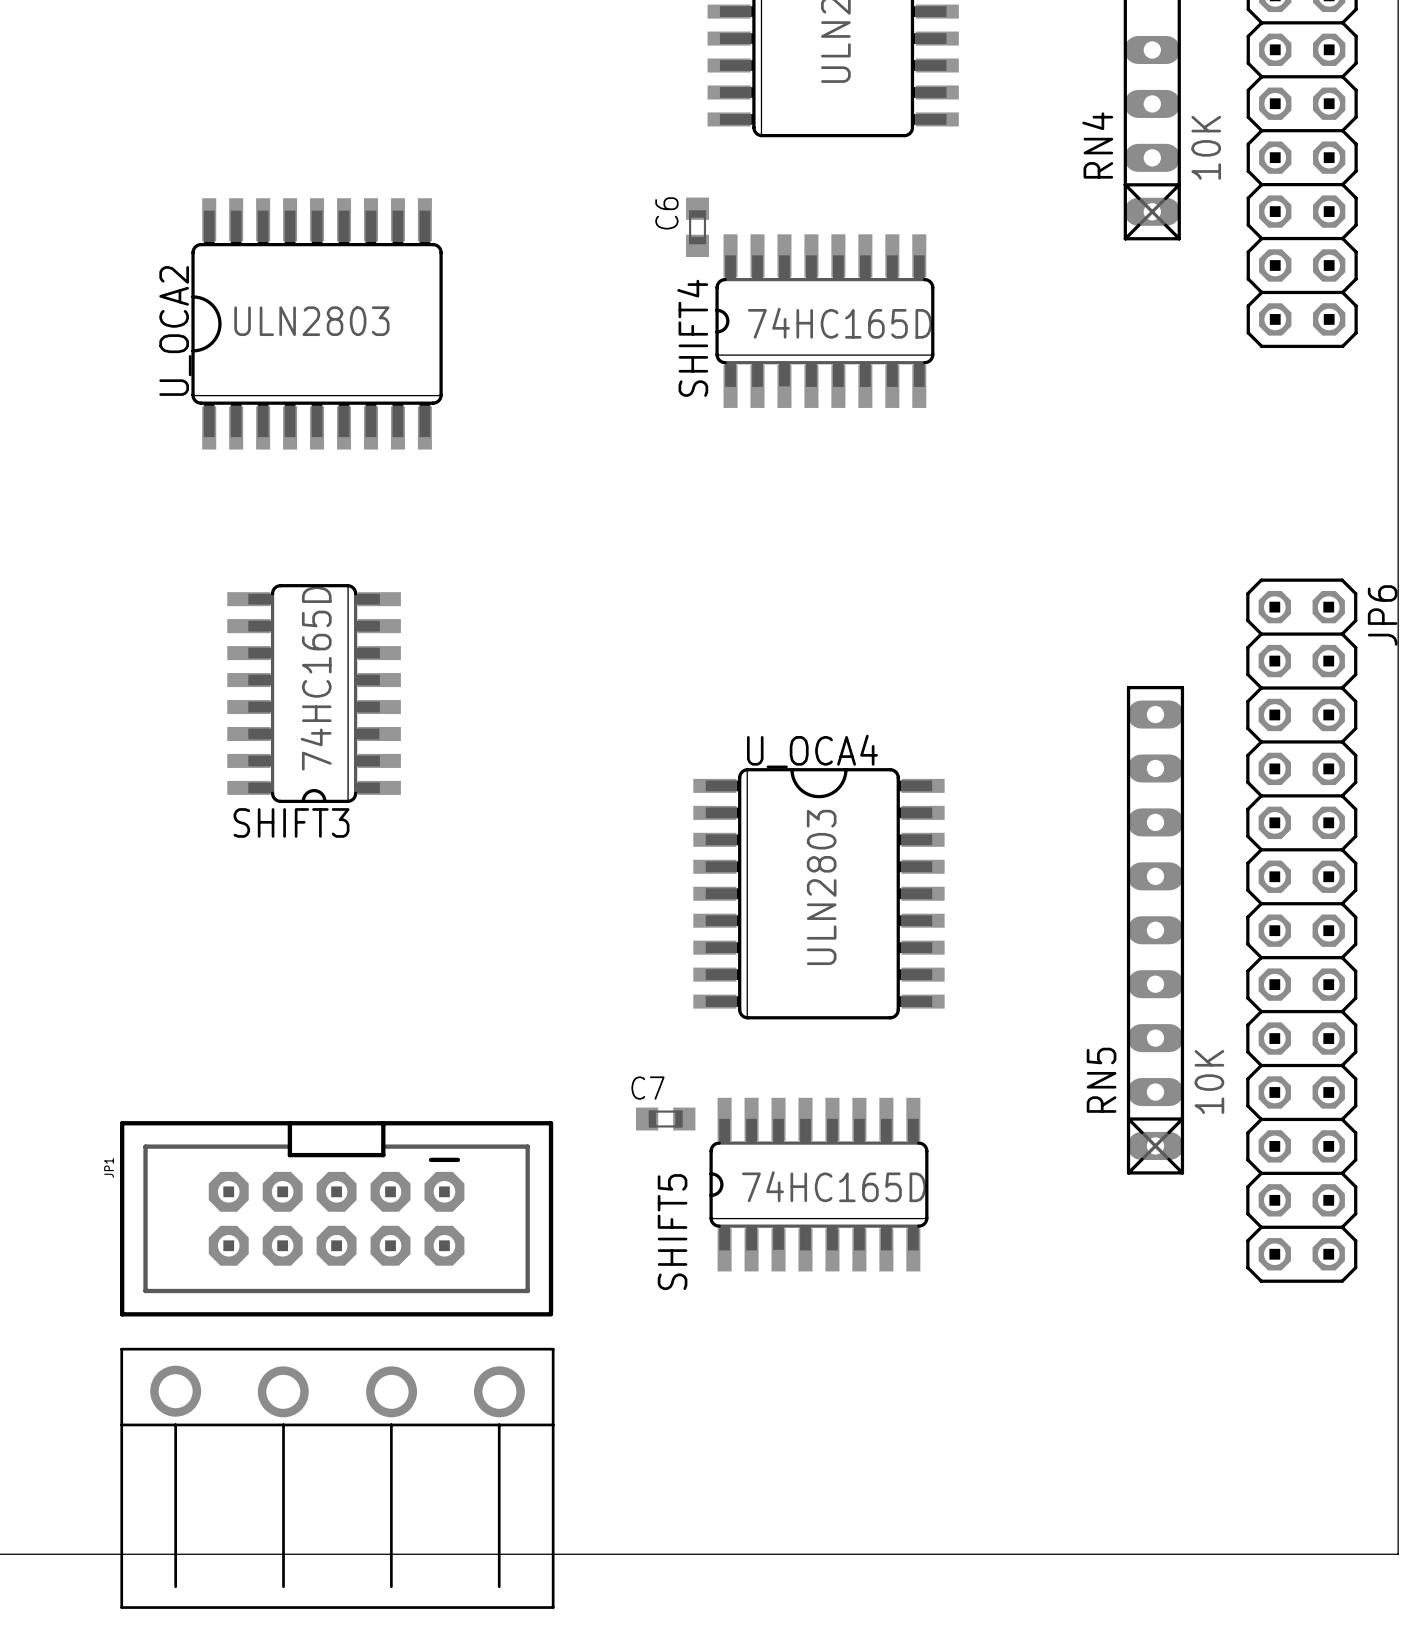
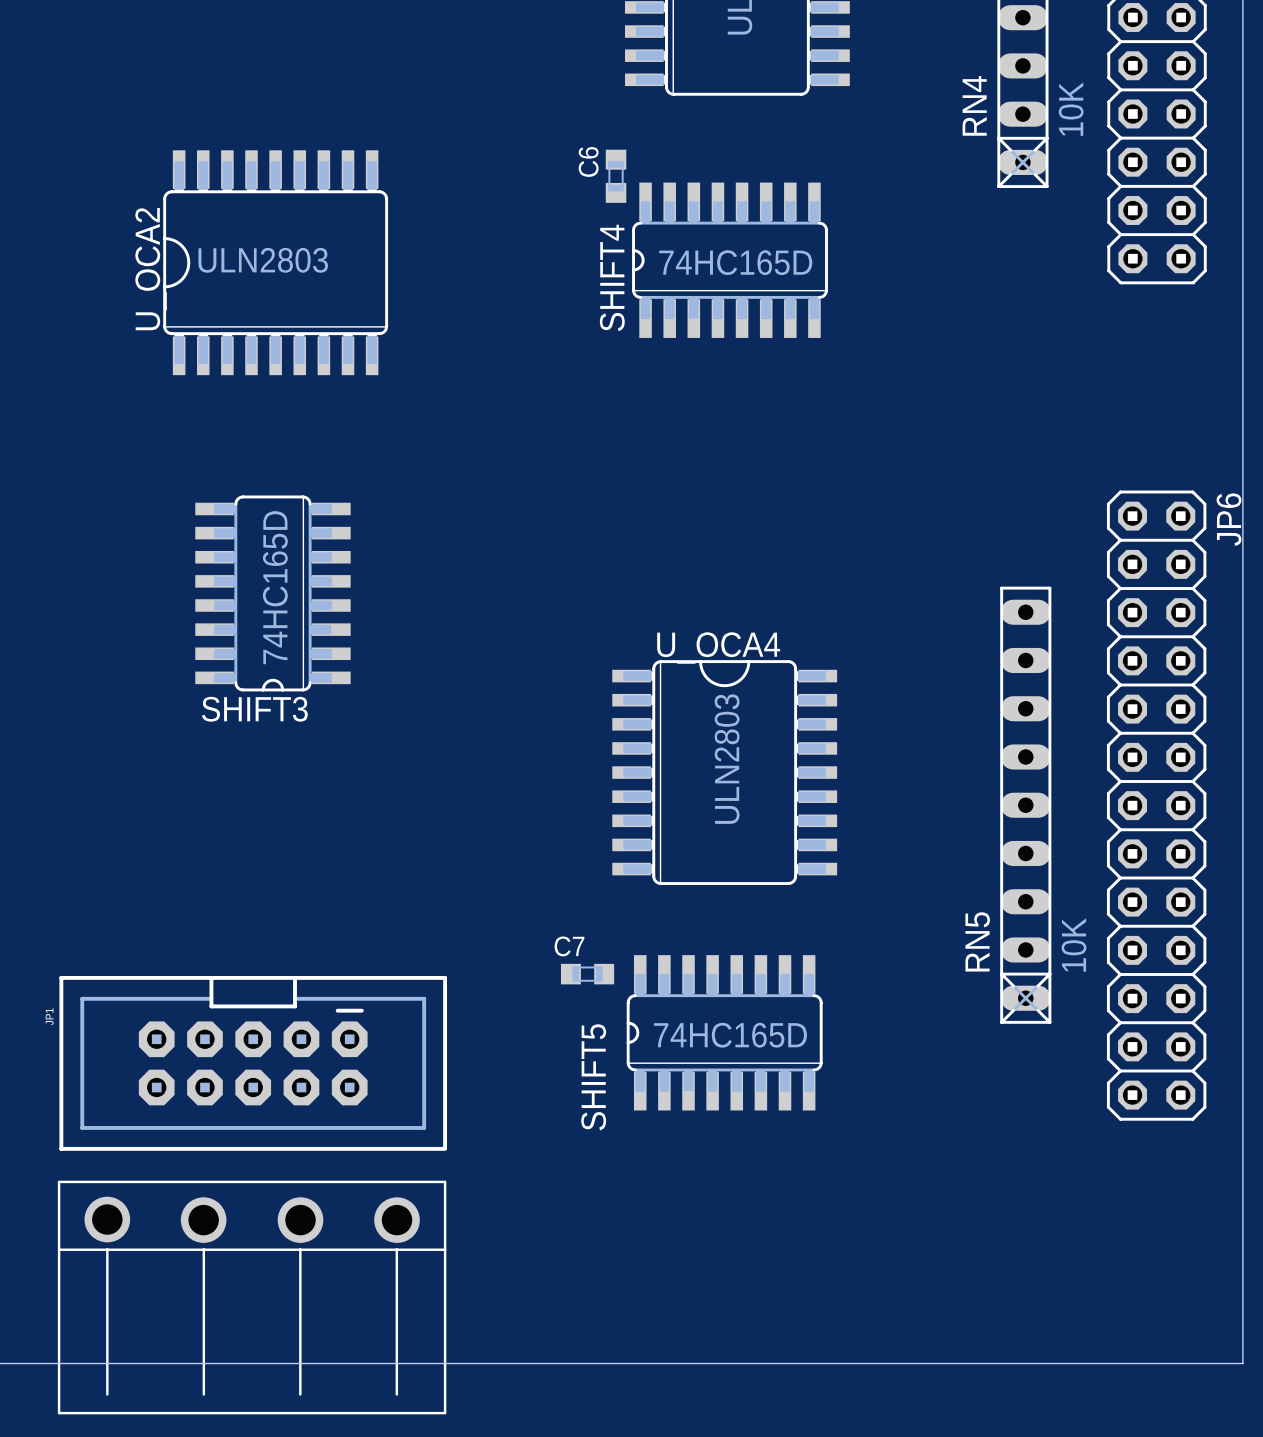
JP1 position: (336, 1218) -> (253, 1063)
part position: (337, 1478) -> (251, 1297)

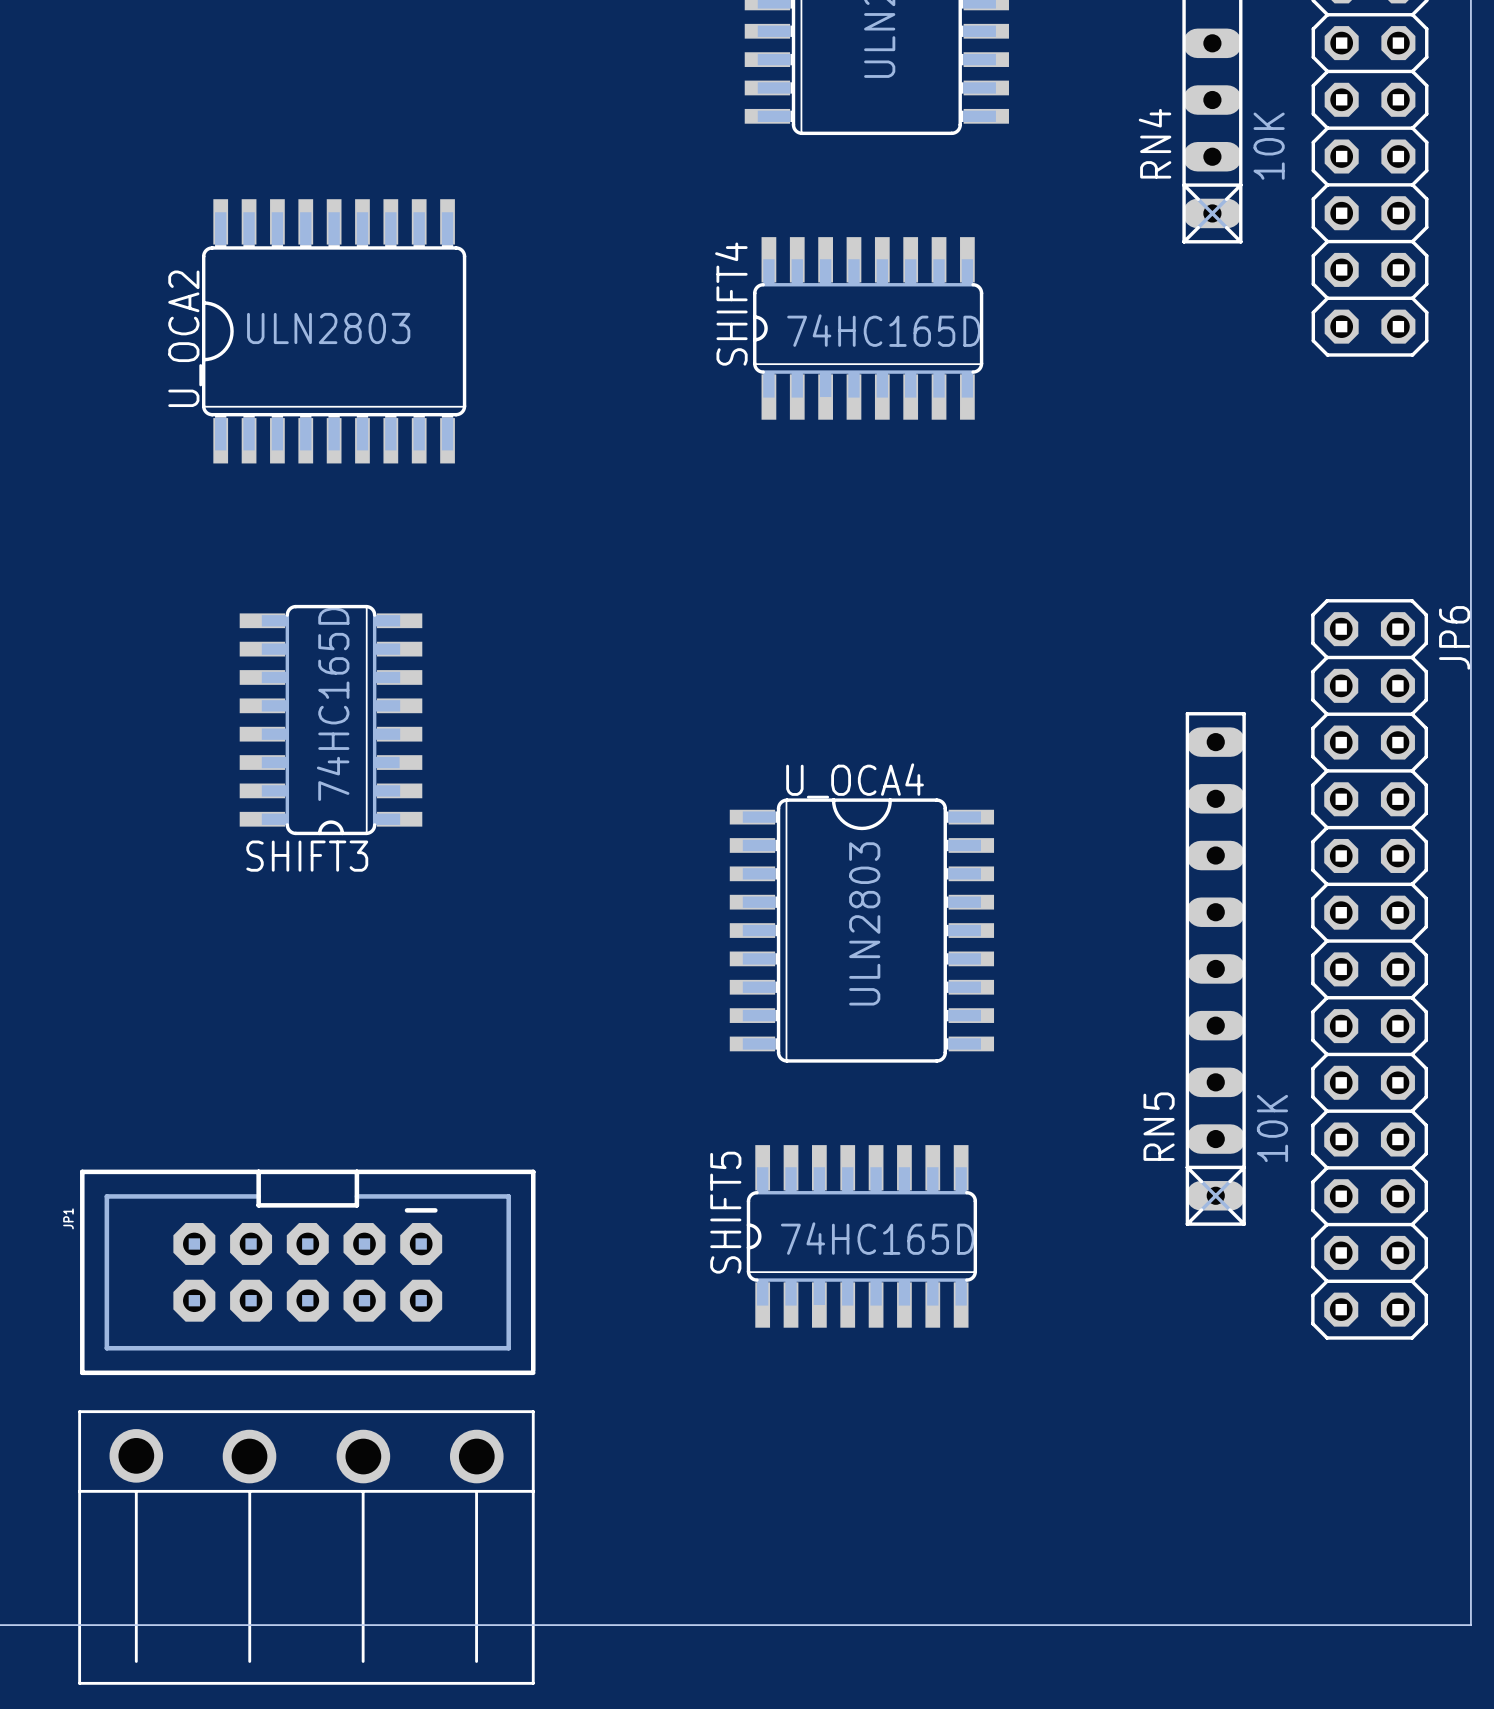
C6: (616, 176) -> none
SHIFT4 name position: SHIFT4 (612, 277) -> SHIFT4 (731, 304)
C7: (587, 974) -> none
SHIFT5 name position: SHIFT5 (593, 1077) -> SHIFT5 (725, 1212)

